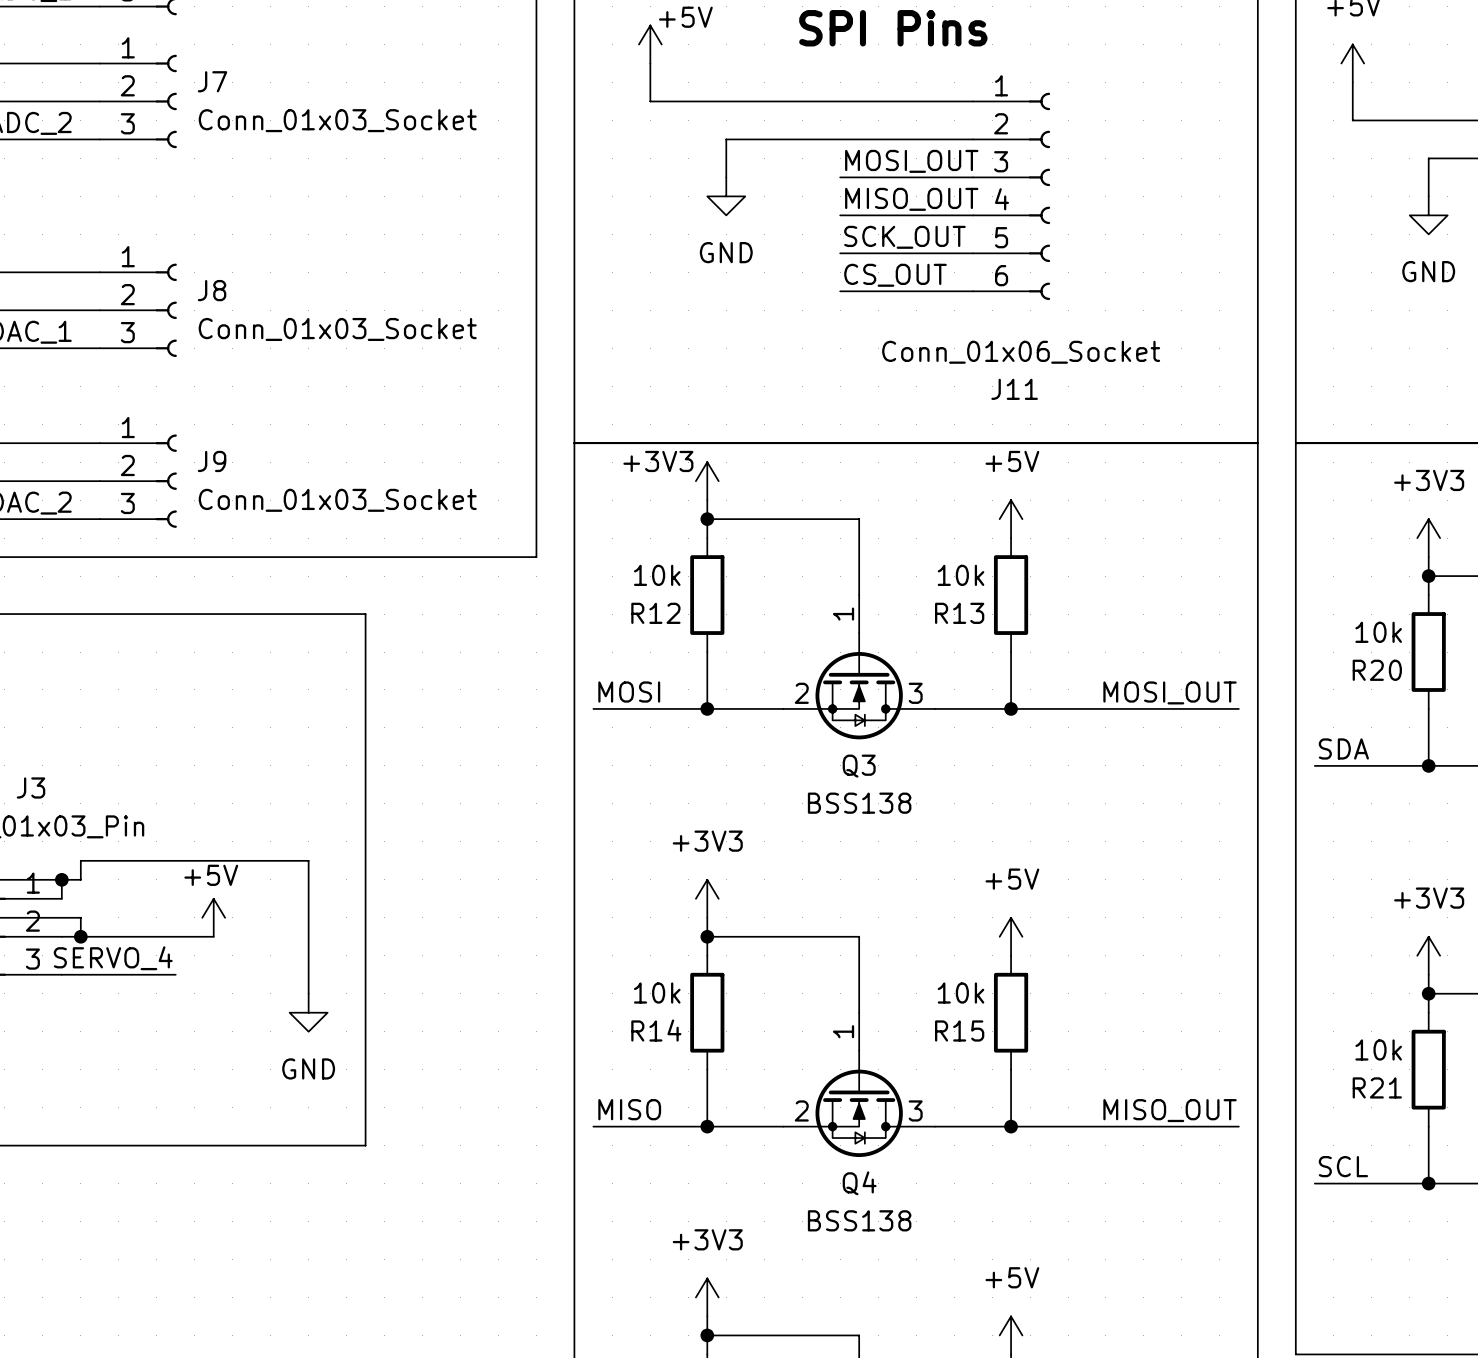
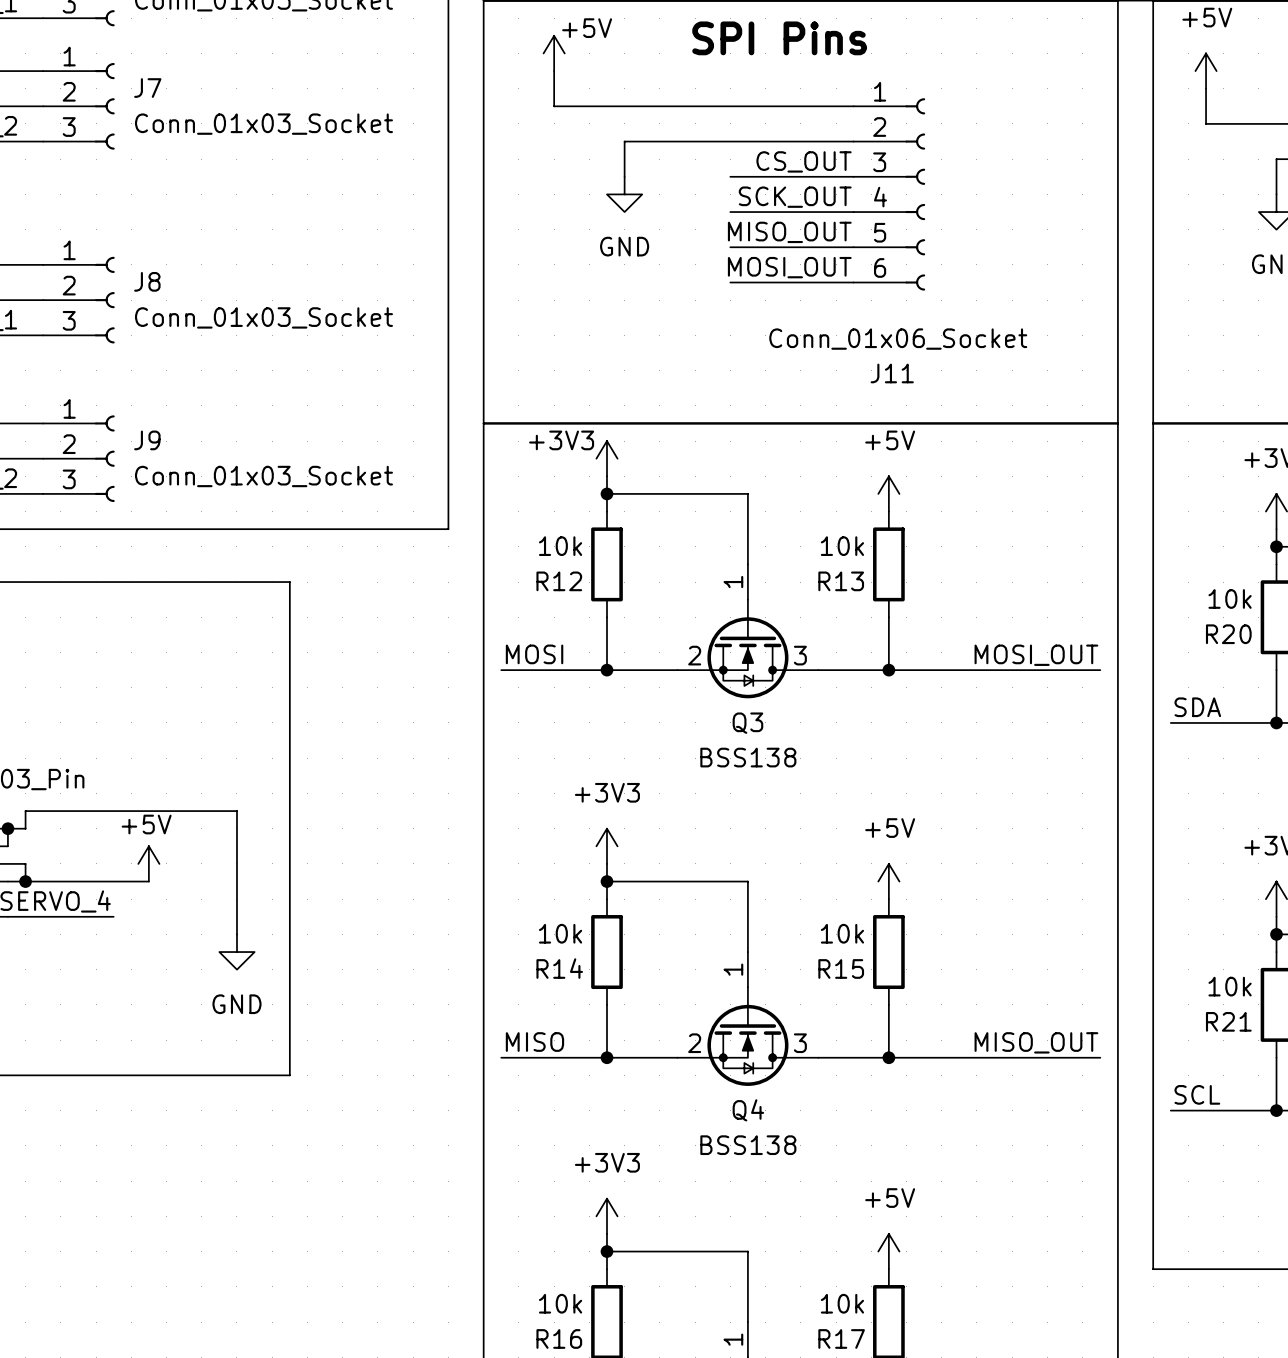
label position: MOSI_OUT (911, 161) -> MOSI_OUT (789, 267)
label position: MISO_OUT (911, 199) -> MISO_OUT (789, 232)
label position: SCK_OUT (904, 237) -> SCK_OUT (795, 197)
label position: CS_OUT (895, 275) -> CS_OUT (804, 161)

